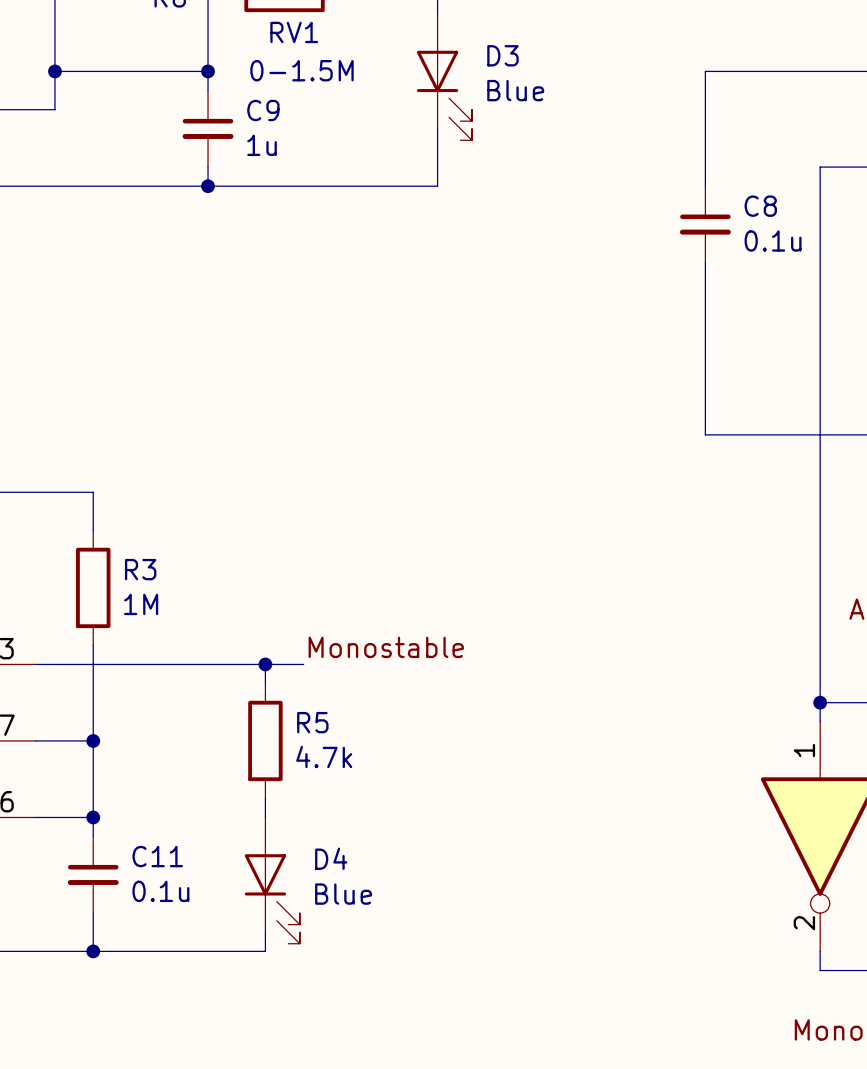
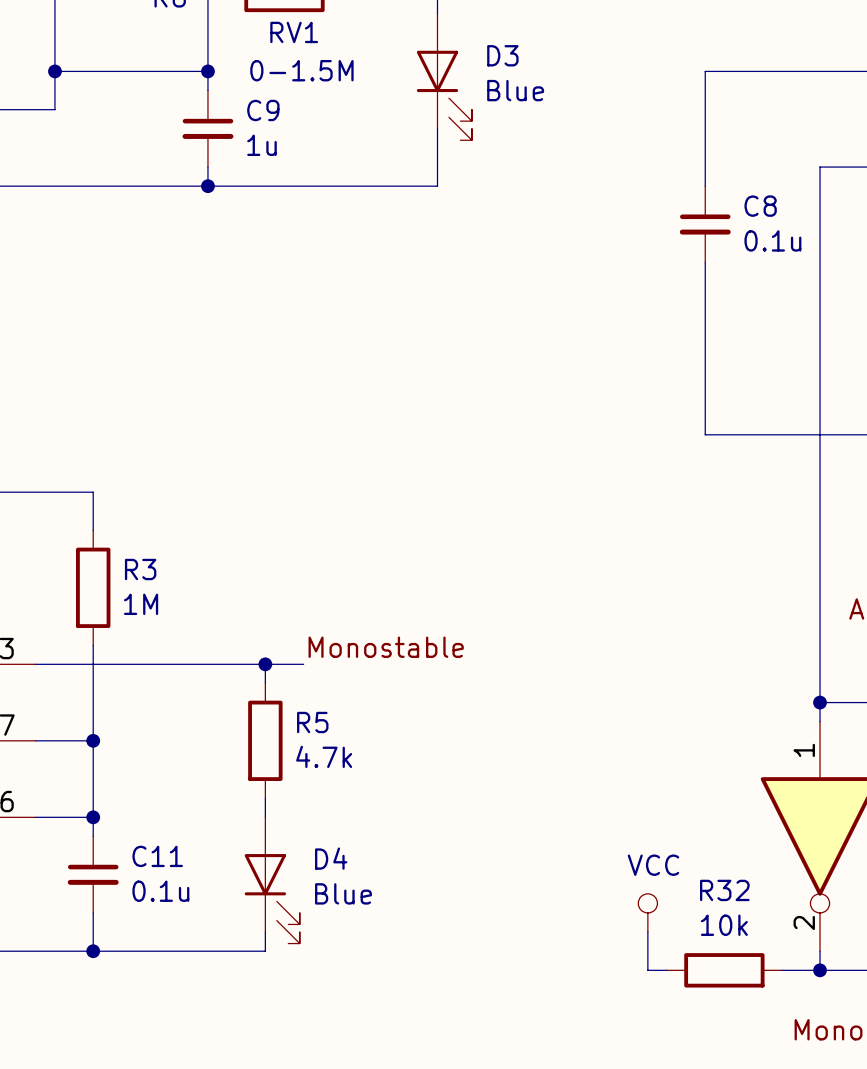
power symbol: none -> VCC (647, 912)
wire: none -> (647, 932) (647, 970) (667, 970)
R32: none -> 10k (724, 970)
wire: none -> (781, 970) (820, 970)
junction: none -> (820, 970)

